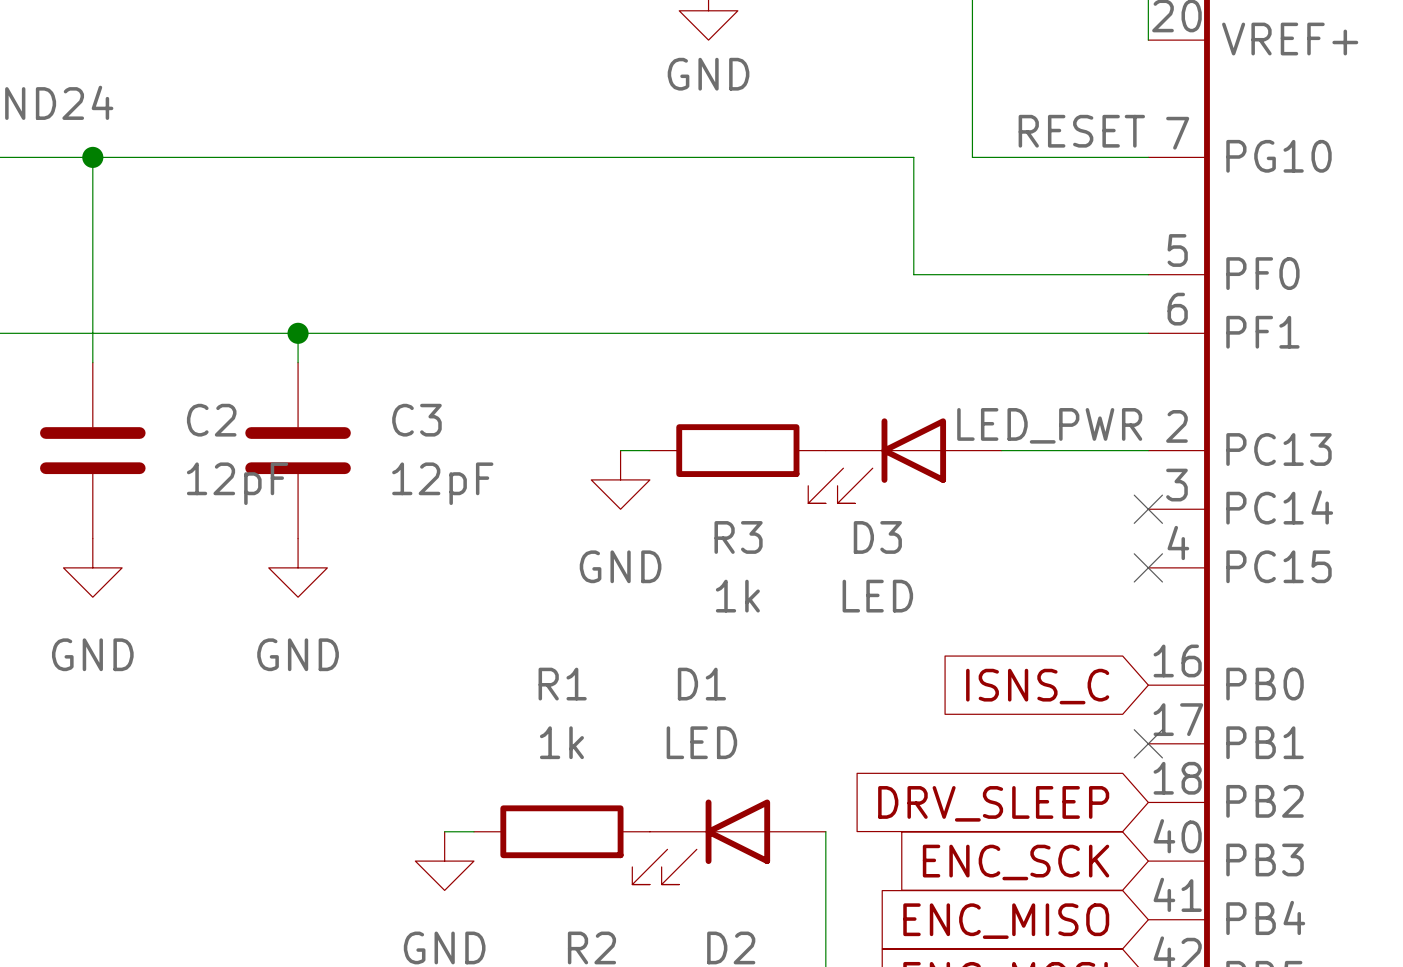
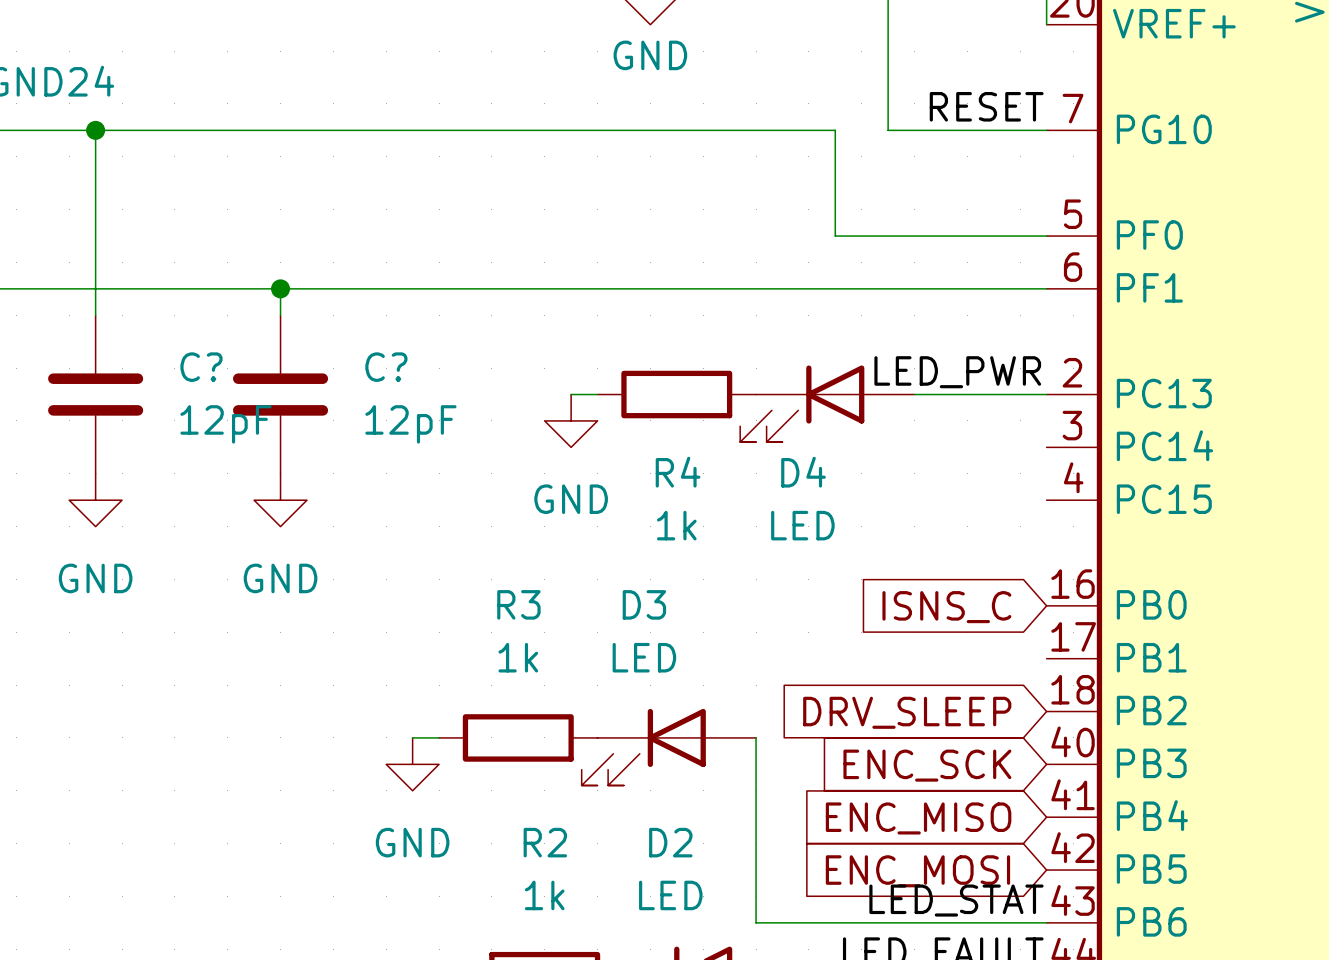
C2 name: C2 (211, 420) -> C? (201, 367)
C3 name: C3 (416, 420) -> C? (386, 367)
no-connect mark: (1148, 509) -> none
R3 name: R3 (738, 537) -> R4 (678, 472)
D3 name: D3 (877, 537) -> D4 (803, 472)
no-connect mark: (1148, 567) -> none
R1 name: R1 (562, 684) -> R3 (518, 604)
D1 name: D1 (701, 684) -> D3 (644, 604)
no-connect mark: (1148, 743) -> none

